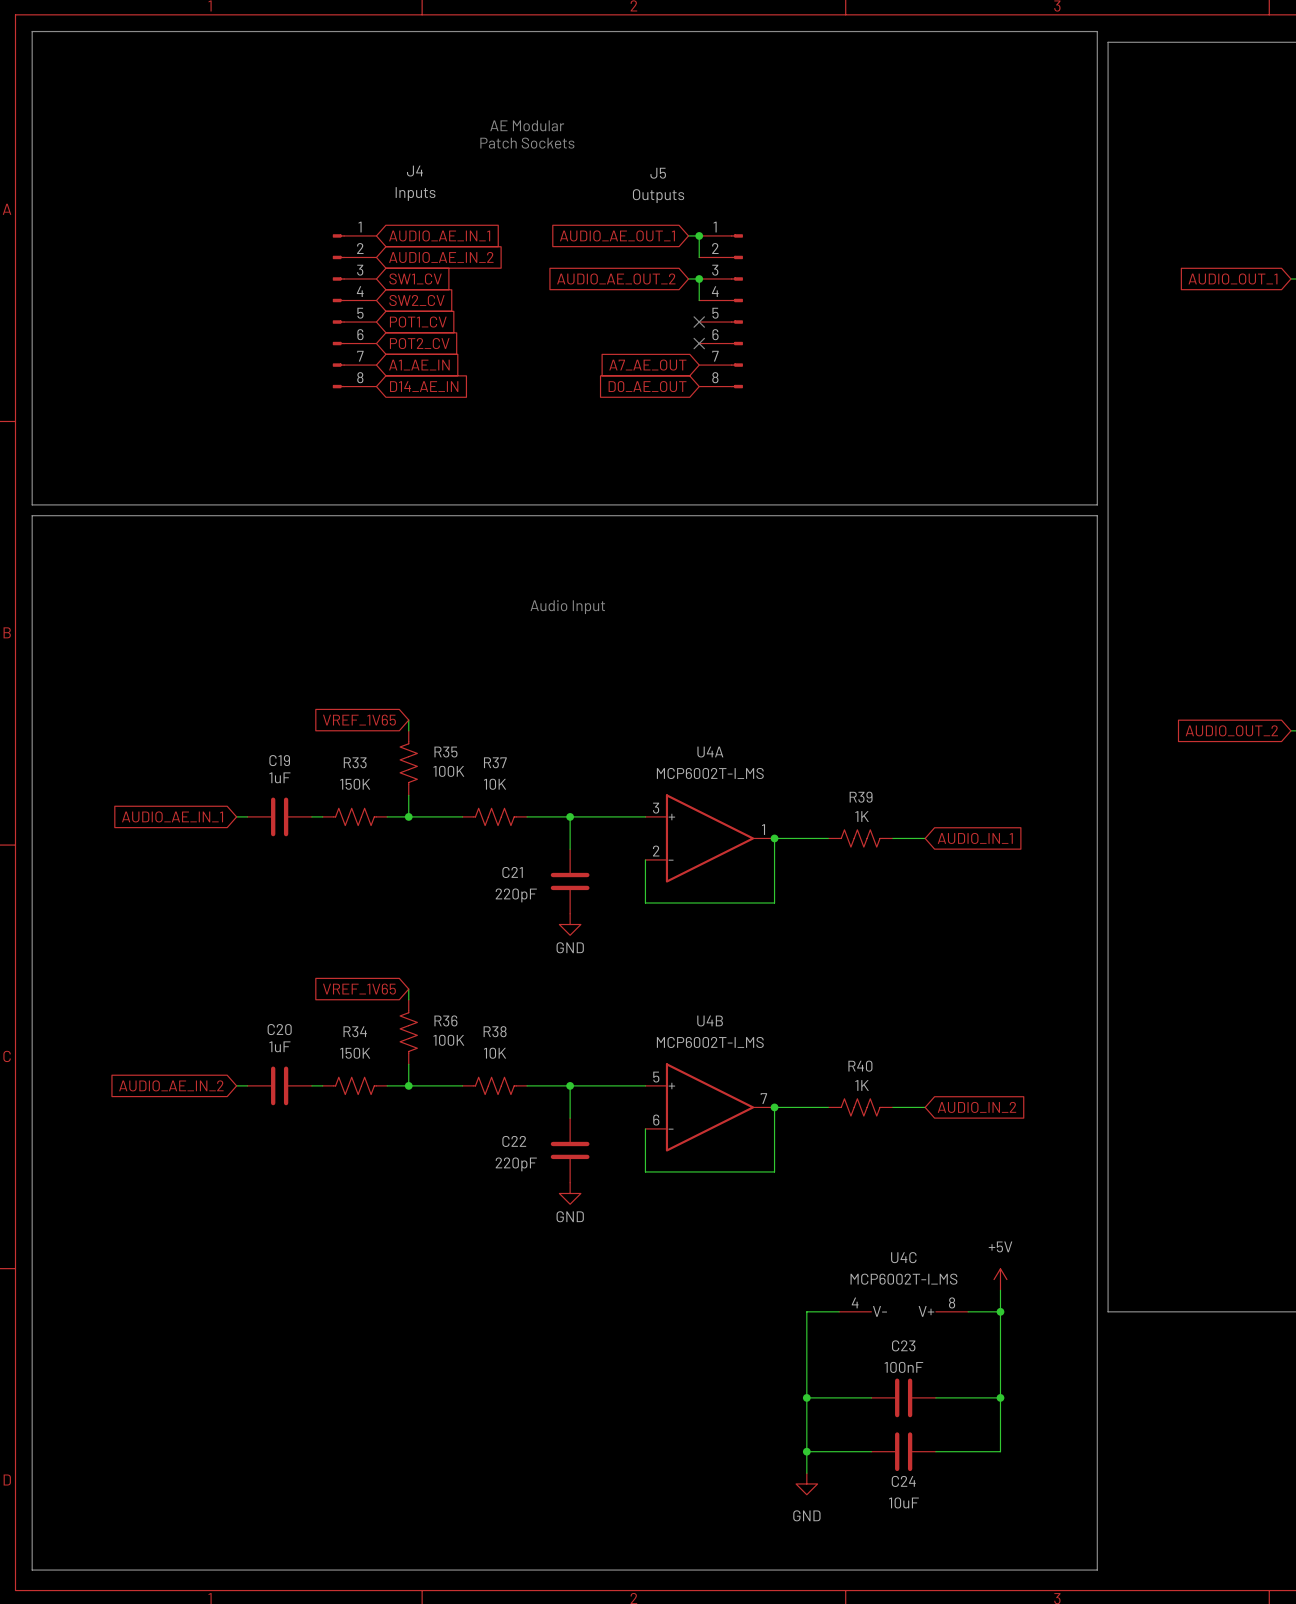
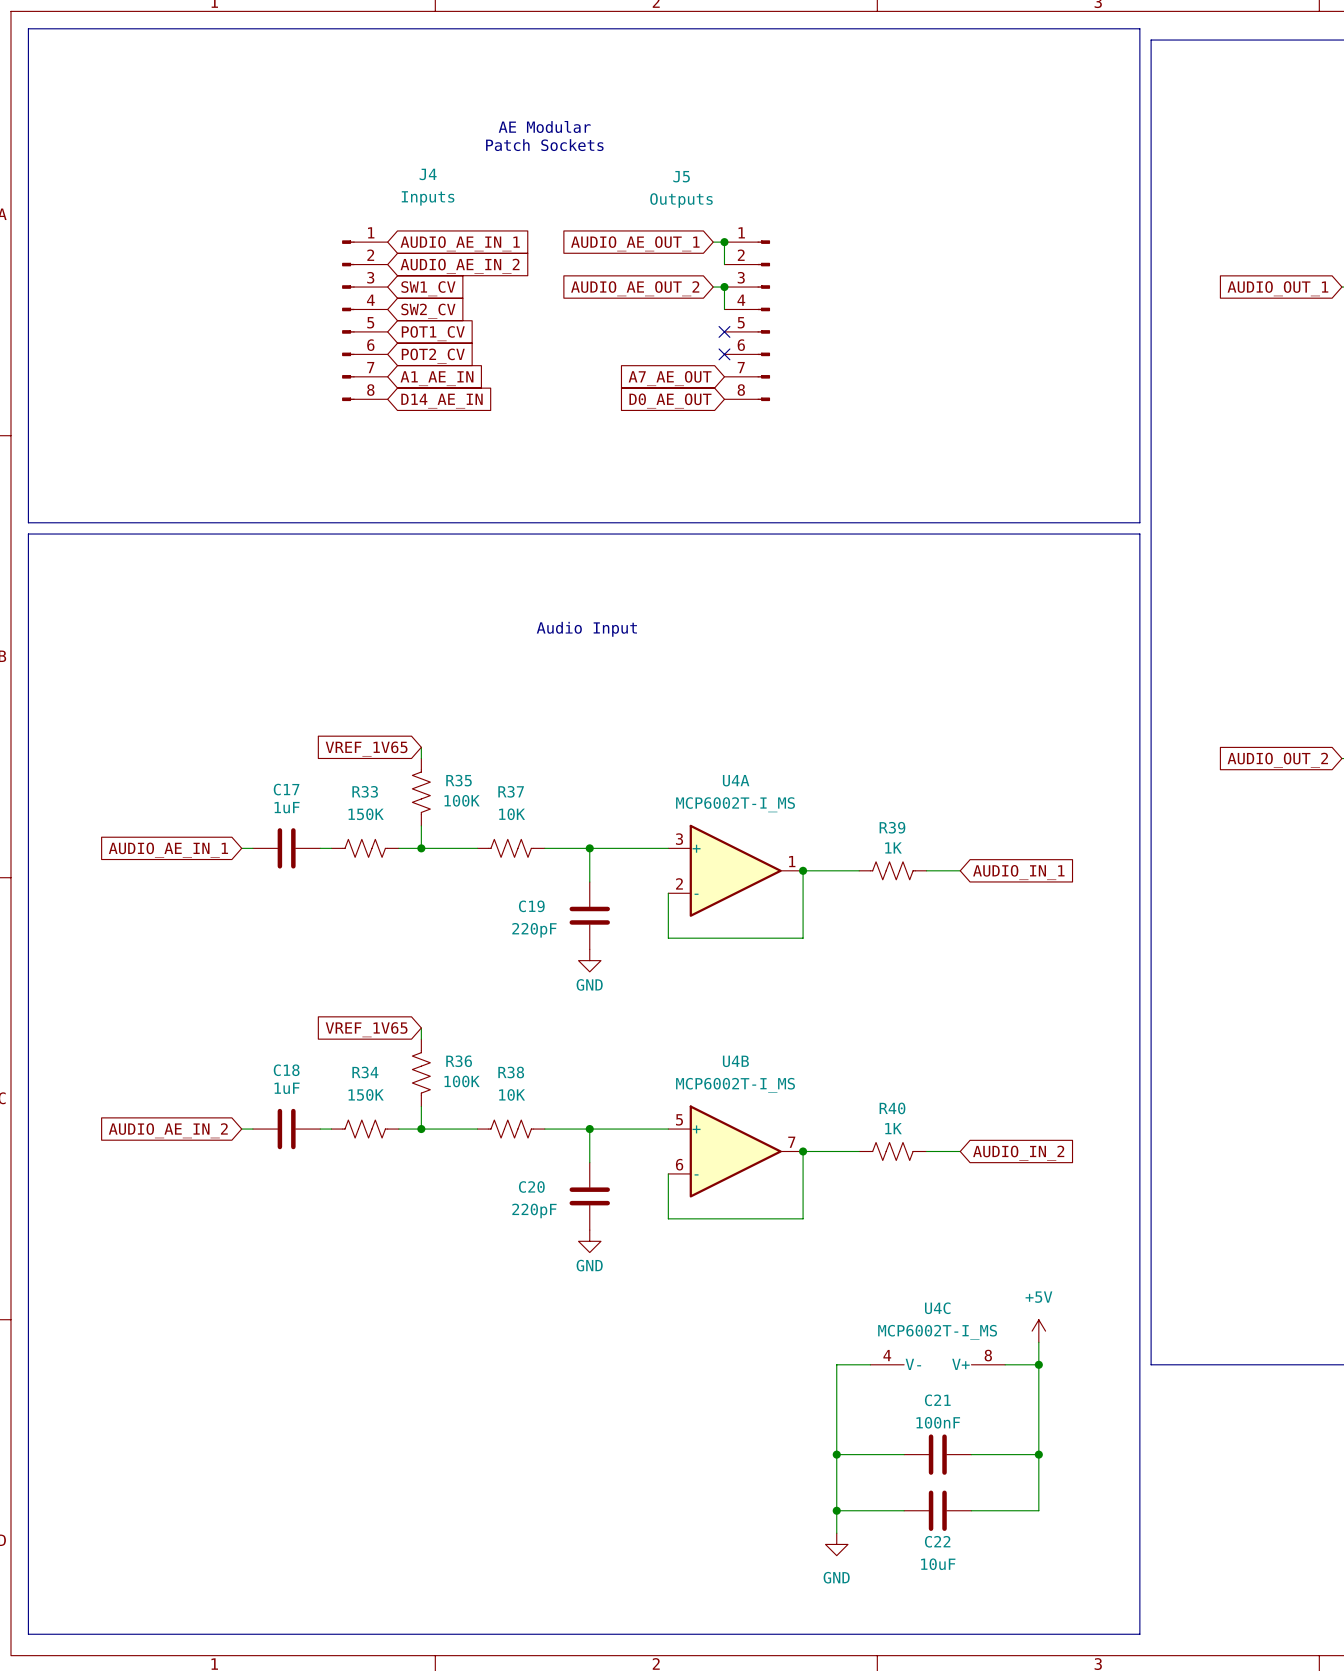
C19 name: C19 (279, 760) -> C17 (286, 789)
C21 name: C21 (512, 872) -> C19 (531, 906)
C20 name: C20 (279, 1029) -> C18 (286, 1070)
C22 name: C22 (514, 1141) -> C20 (531, 1187)
C23 name: C23 (903, 1345) -> C21 (937, 1400)
C24 name: C24 (903, 1481) -> C22 (937, 1541)

